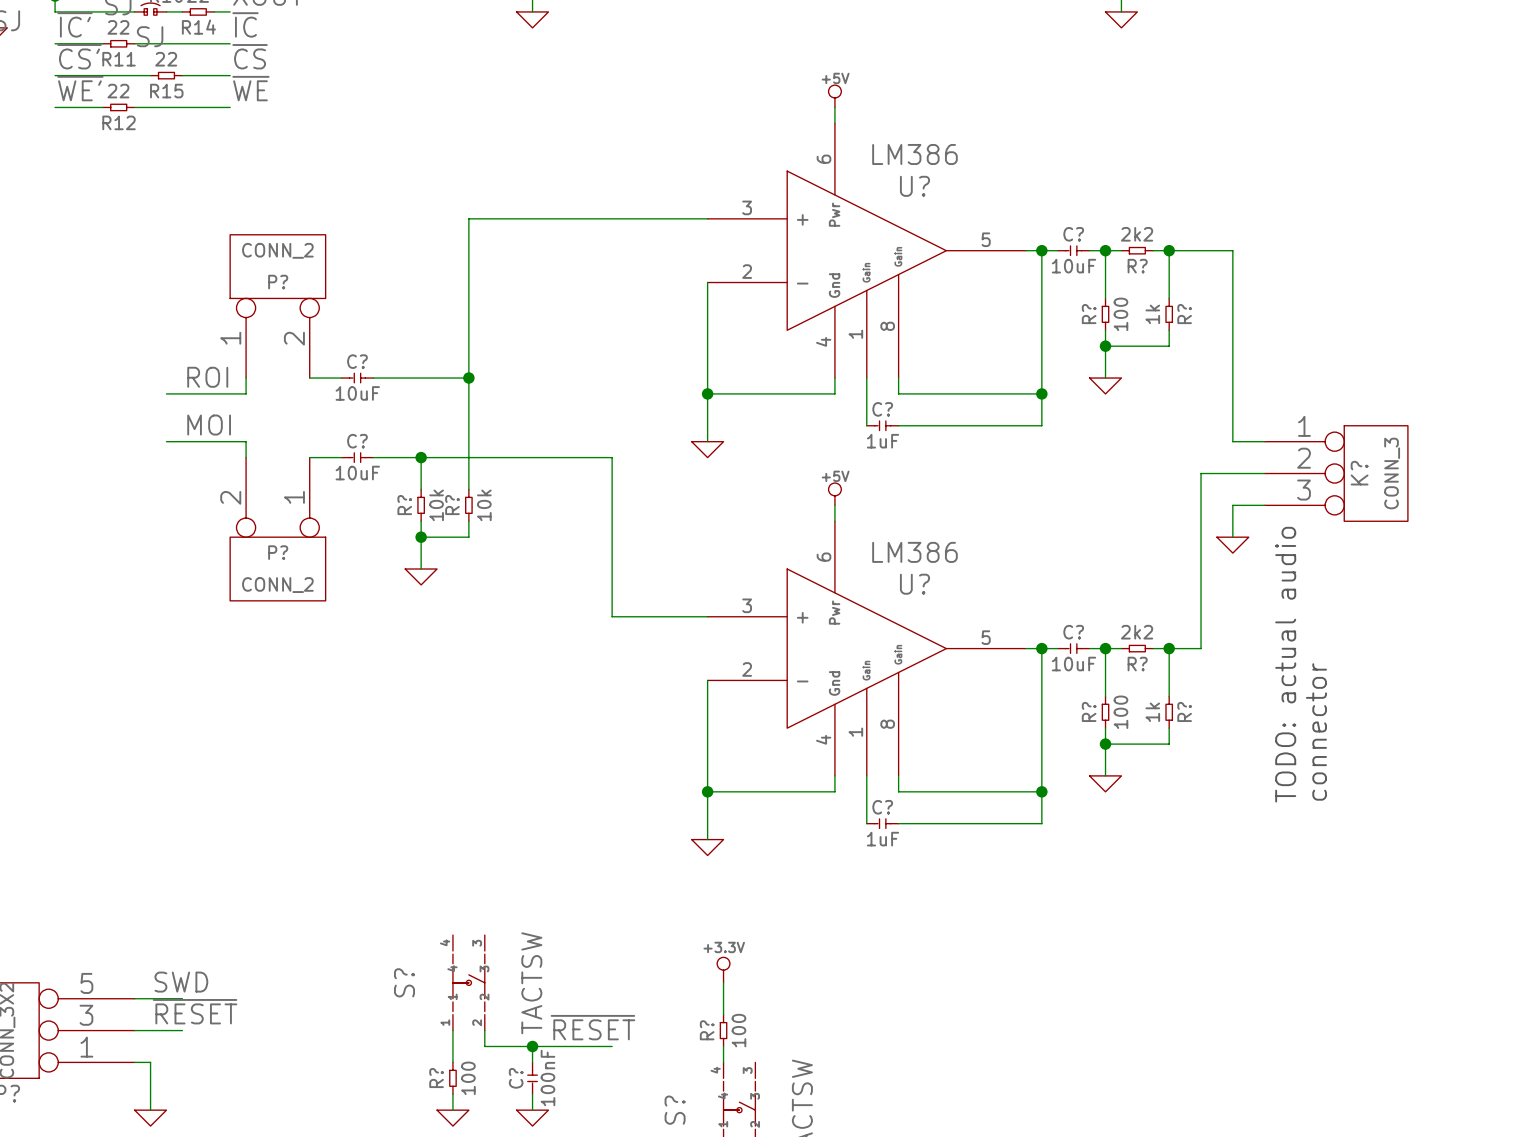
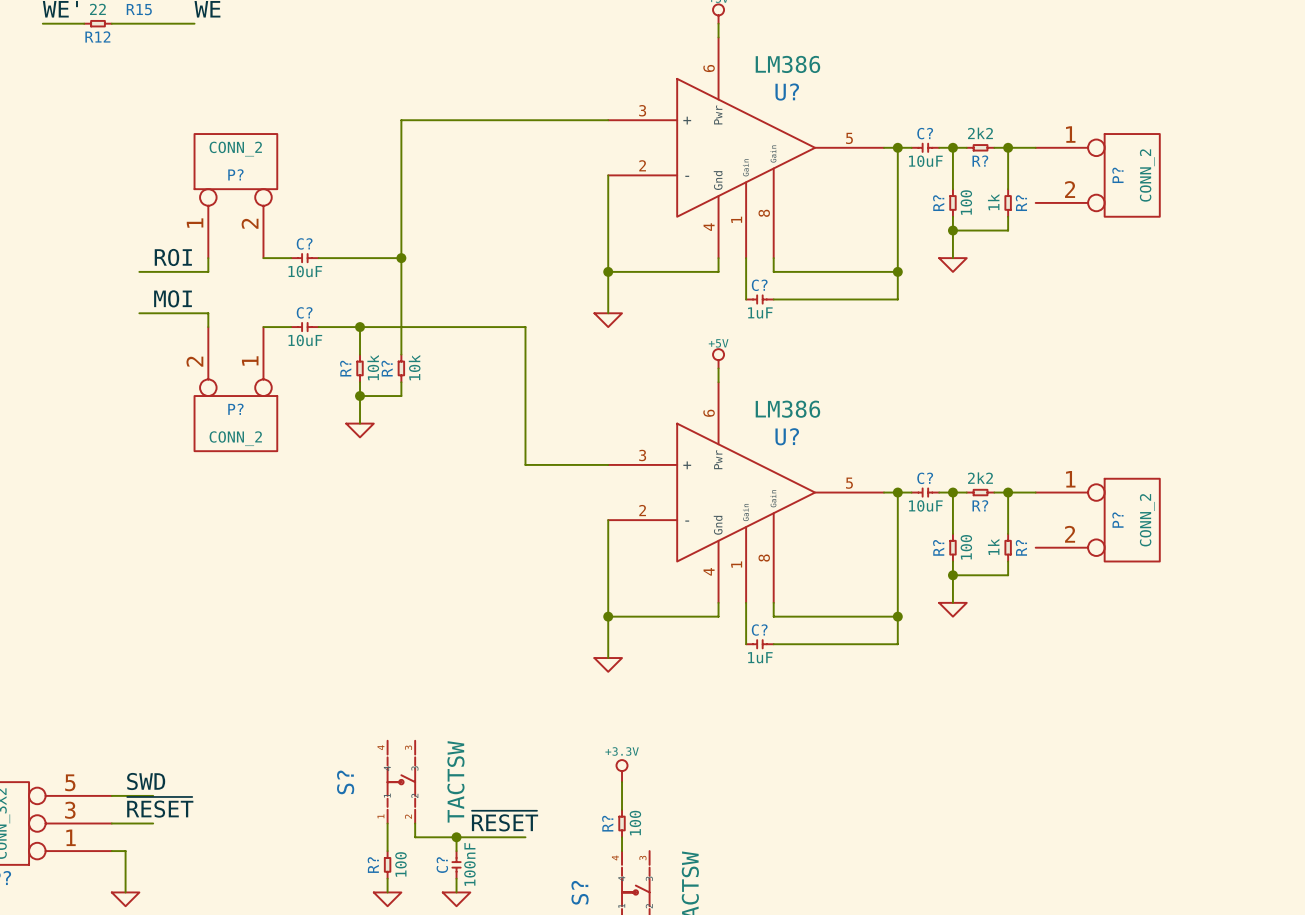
wire: (1201, 250) (1232, 250) (1232, 441) (1264, 441) -> none
P?: none -> CONN_2 (1097, 175)
wire: (1264, 473) (1201, 473) (1201, 648) -> none
K?: CONN_3 (1336, 473) -> none
wire: (1264, 505) (1232, 505) (1232, 537) -> none
power symbol: (1232, 545) -> none
text: TODO: actual audio (1285, 664) -> none
P?: none -> CONN_2 (1097, 520)
text: connector (1316, 731) -> none

